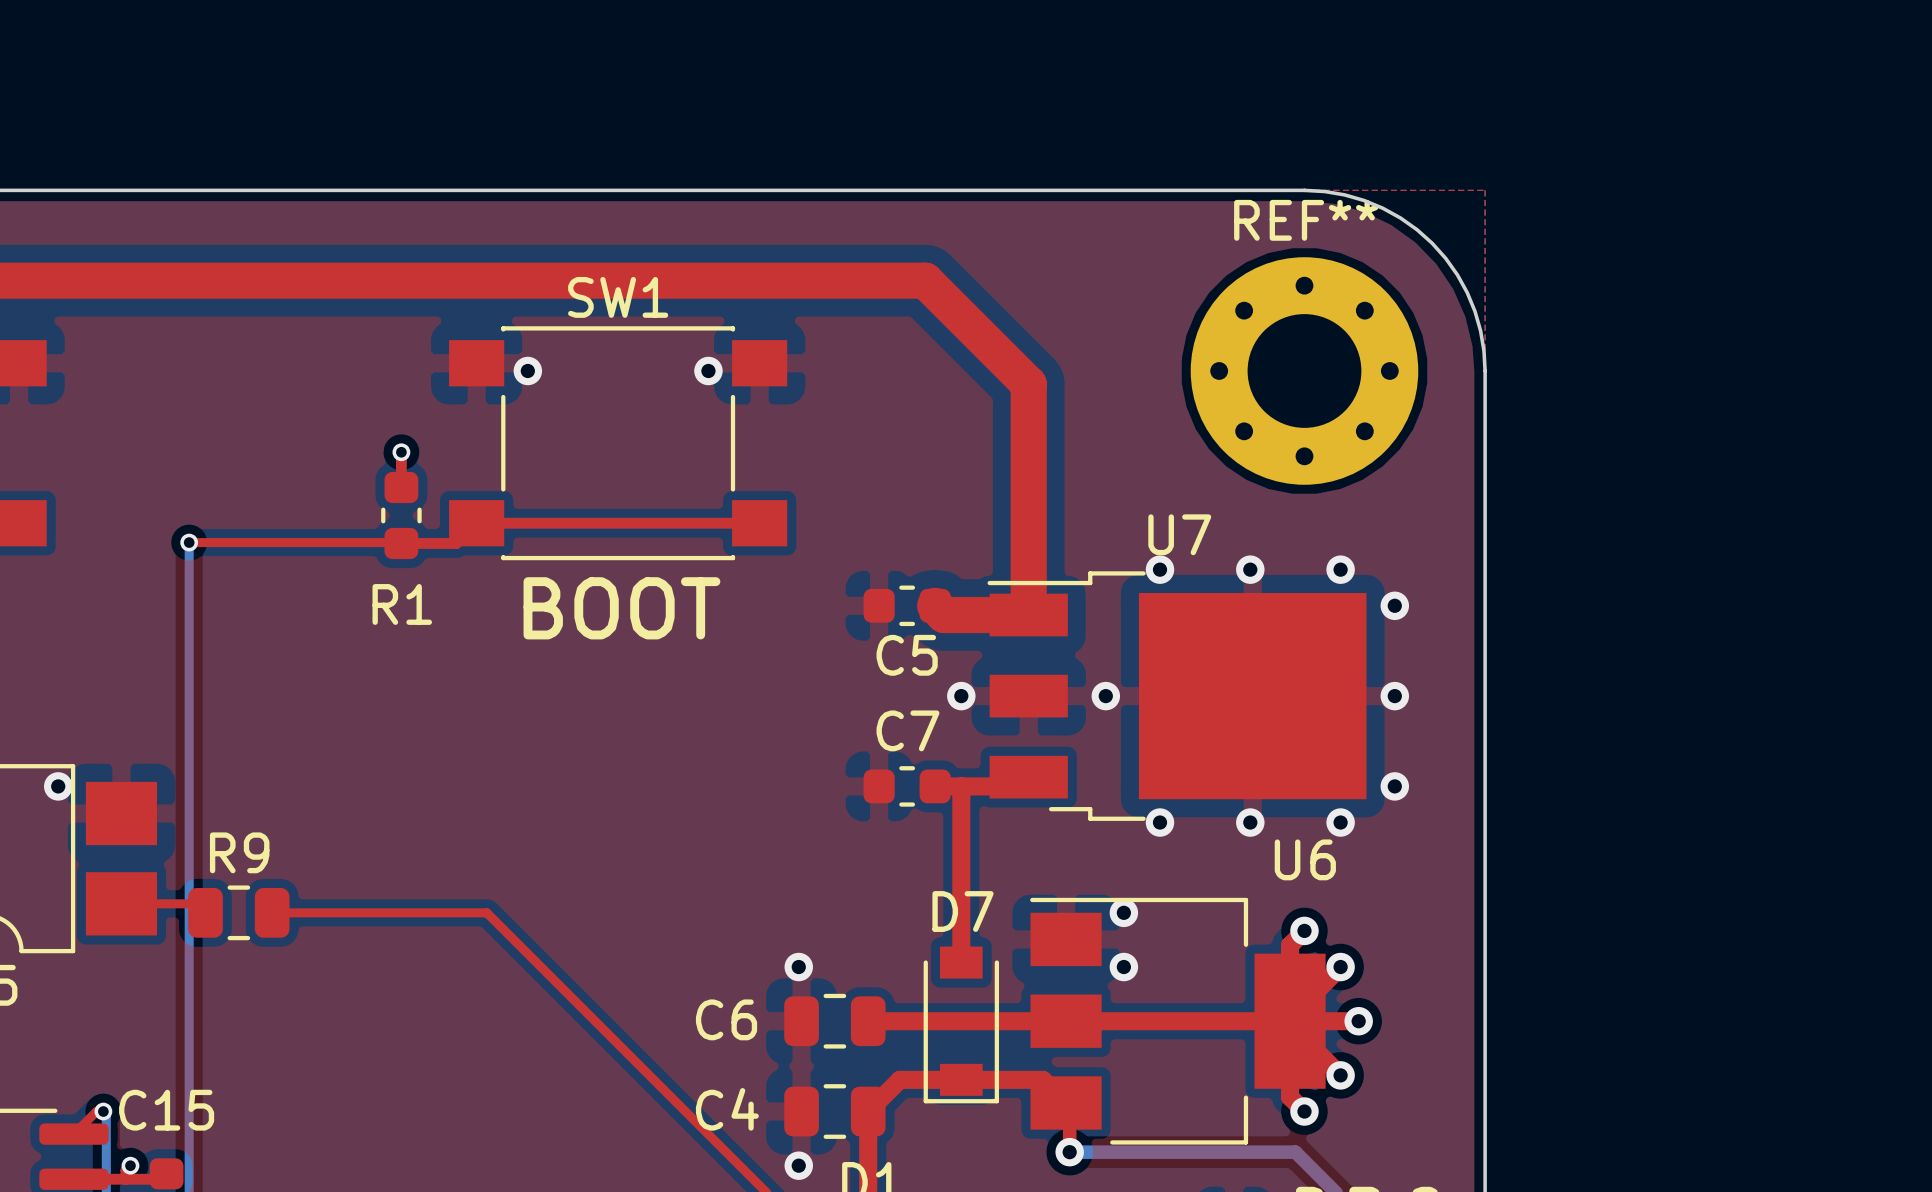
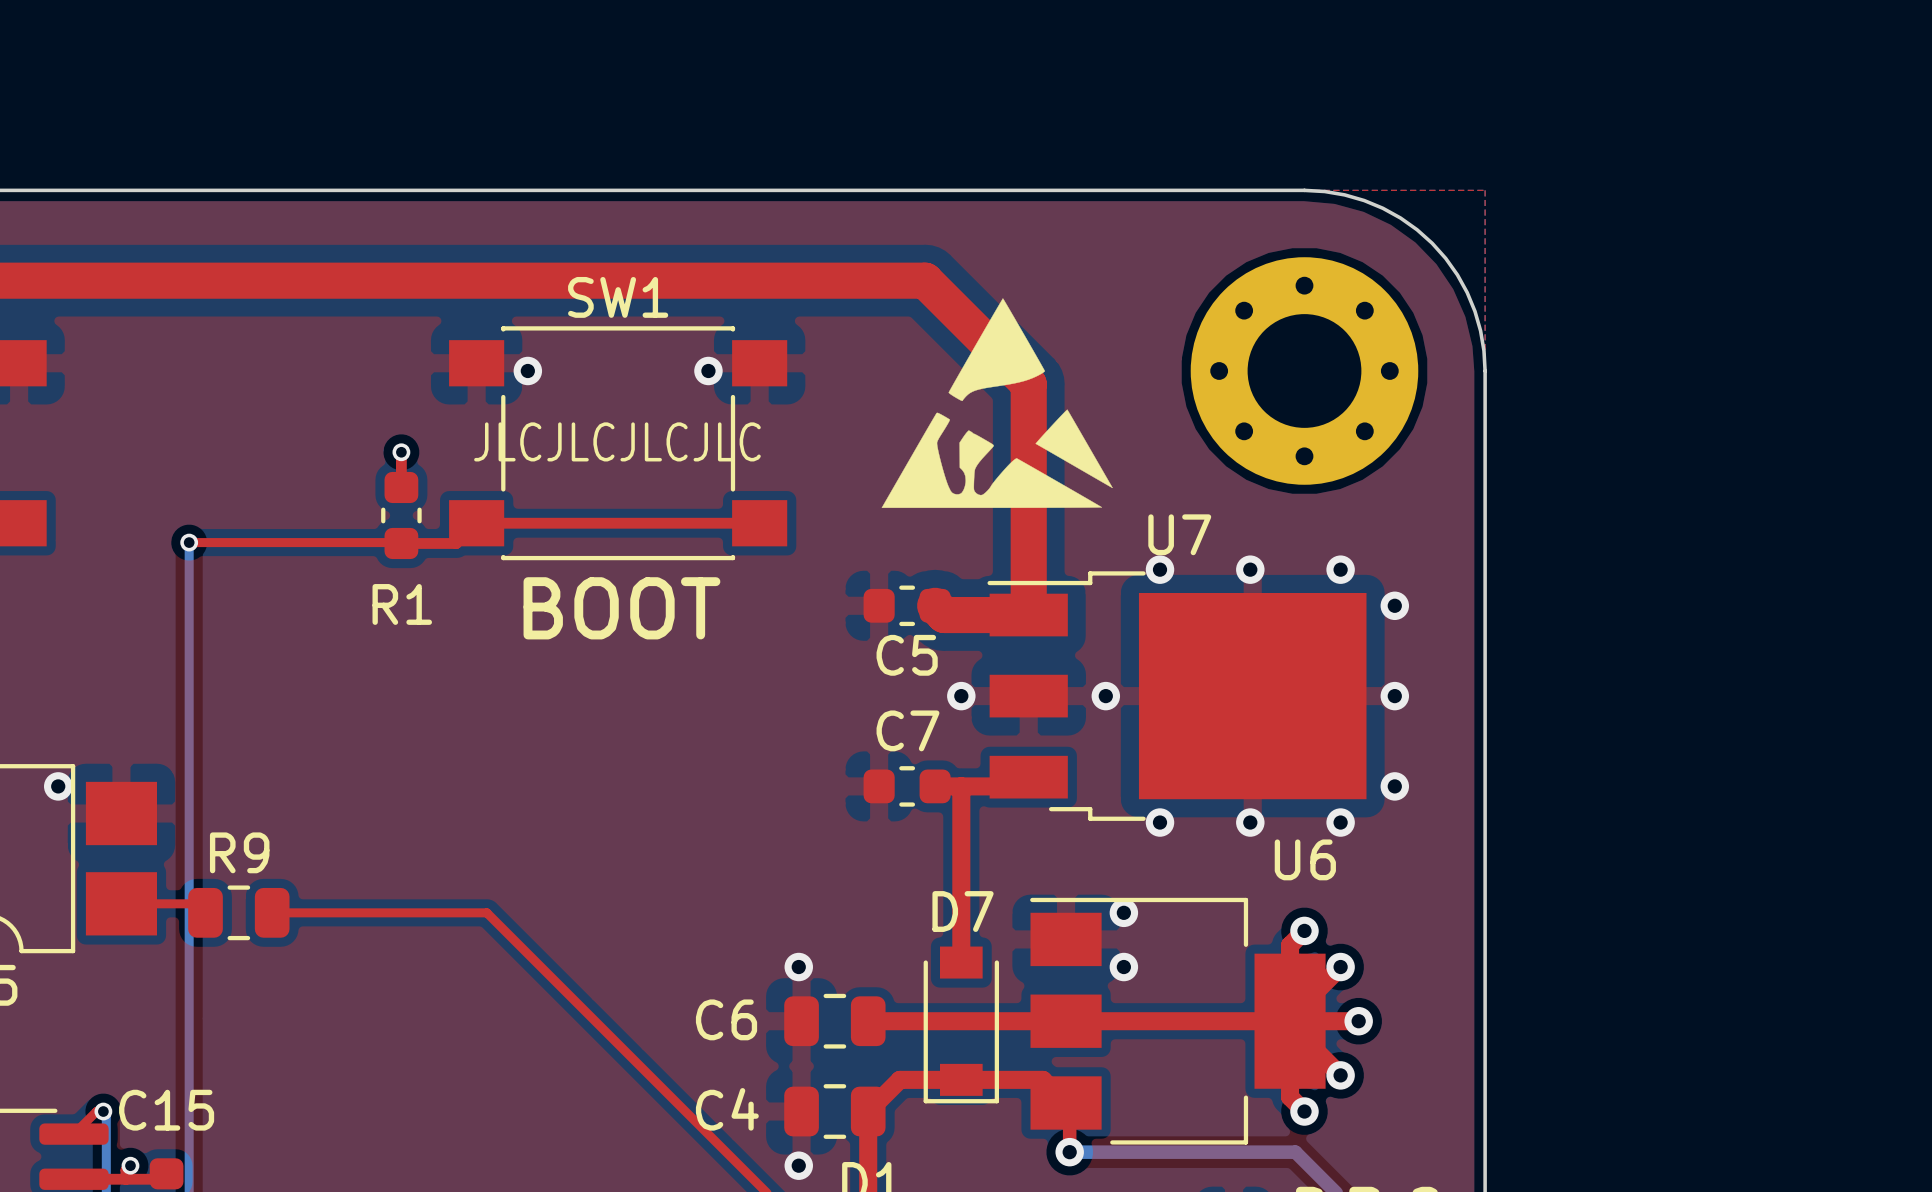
REF** name: REF** (1306, 220) -> none
drawing: none -> [881, 298, 1113, 508]
text: none -> JLCJLCJLCJLC (617, 441)

